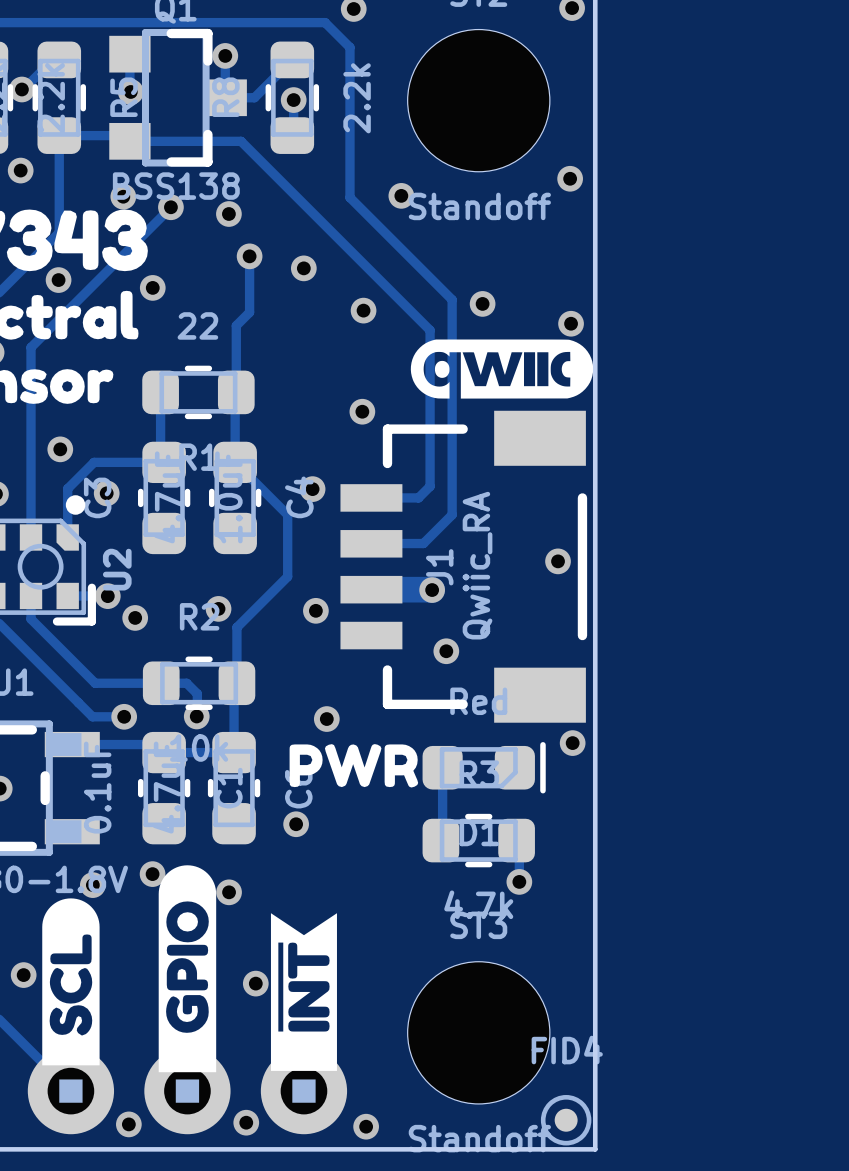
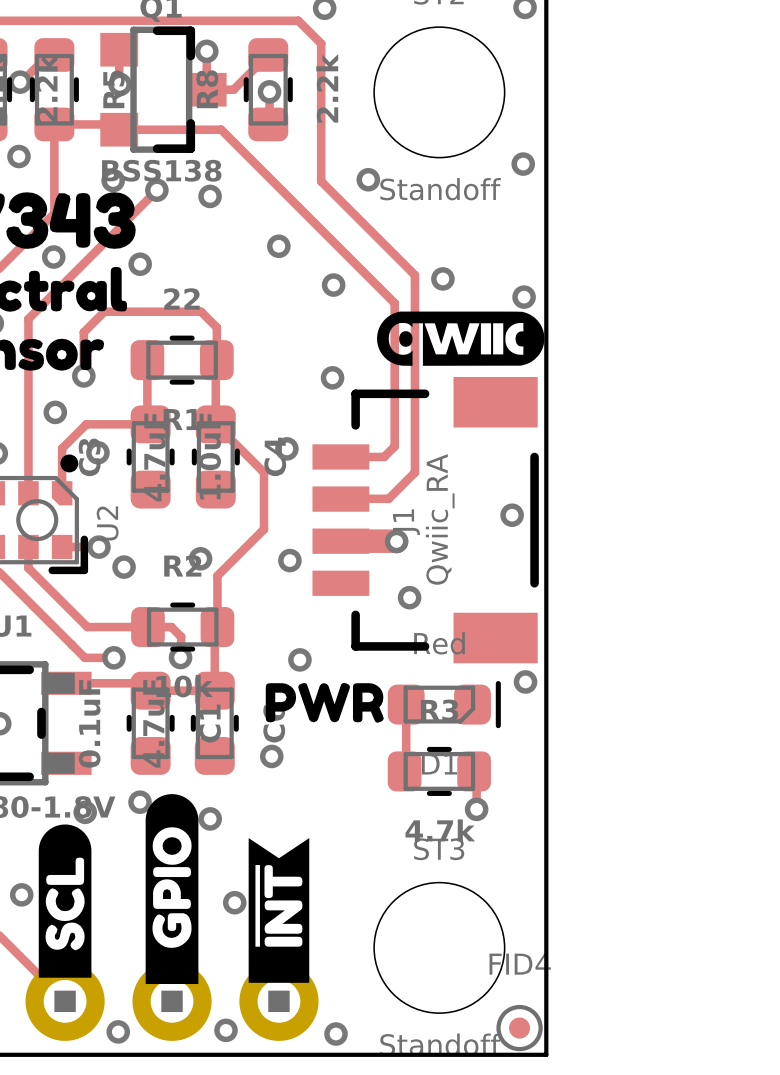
track: (249, 256) (249, 312) (236, 325) (236, 356) -> (83, 375) (83, 332) (104, 311) (201, 311) (216, 327)
via position: (249, 256) -> (83, 375)

